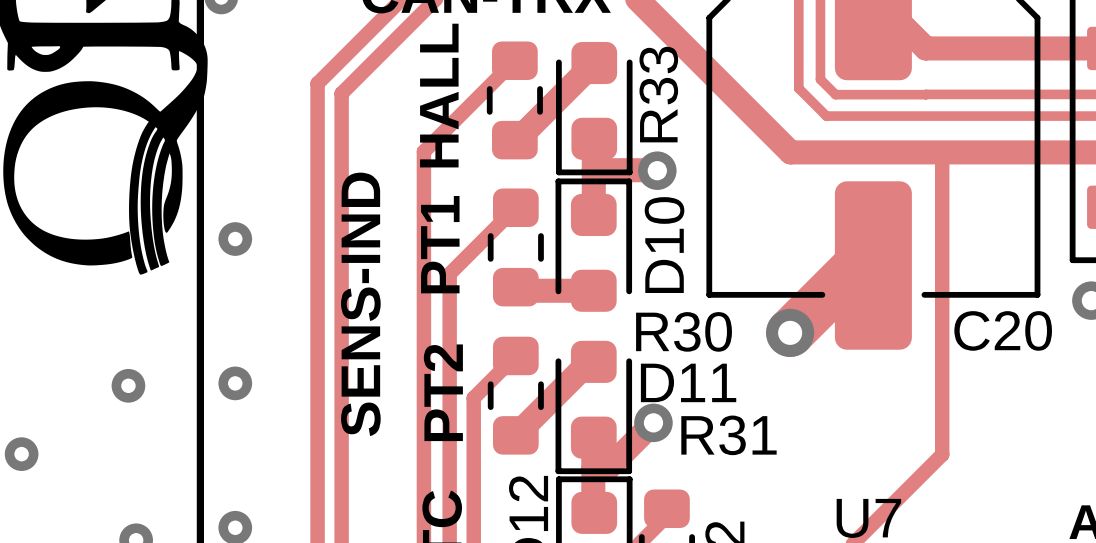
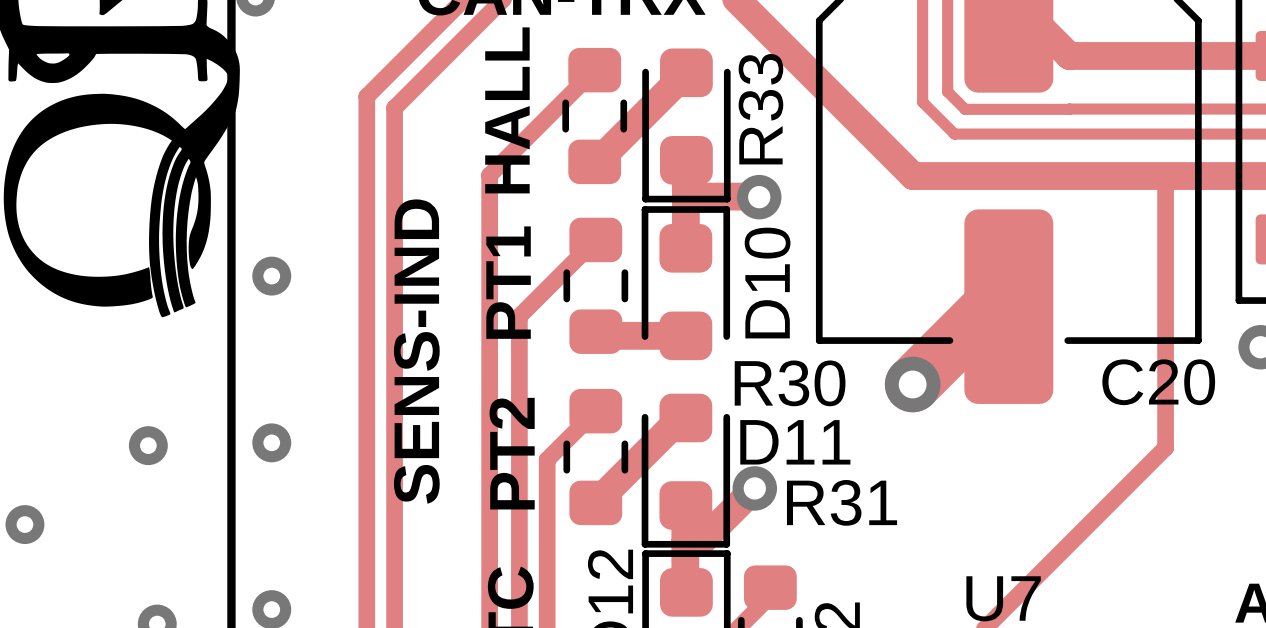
track: (942, 152) (942, 454) -> (1165, 176) (1165, 447) (1088, 525)

